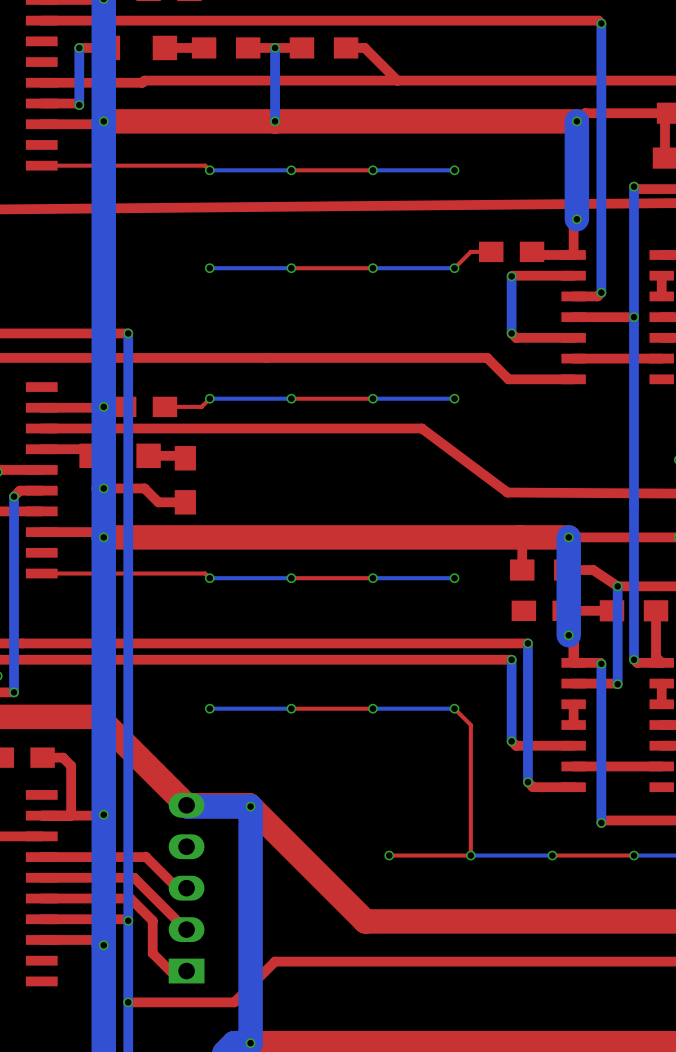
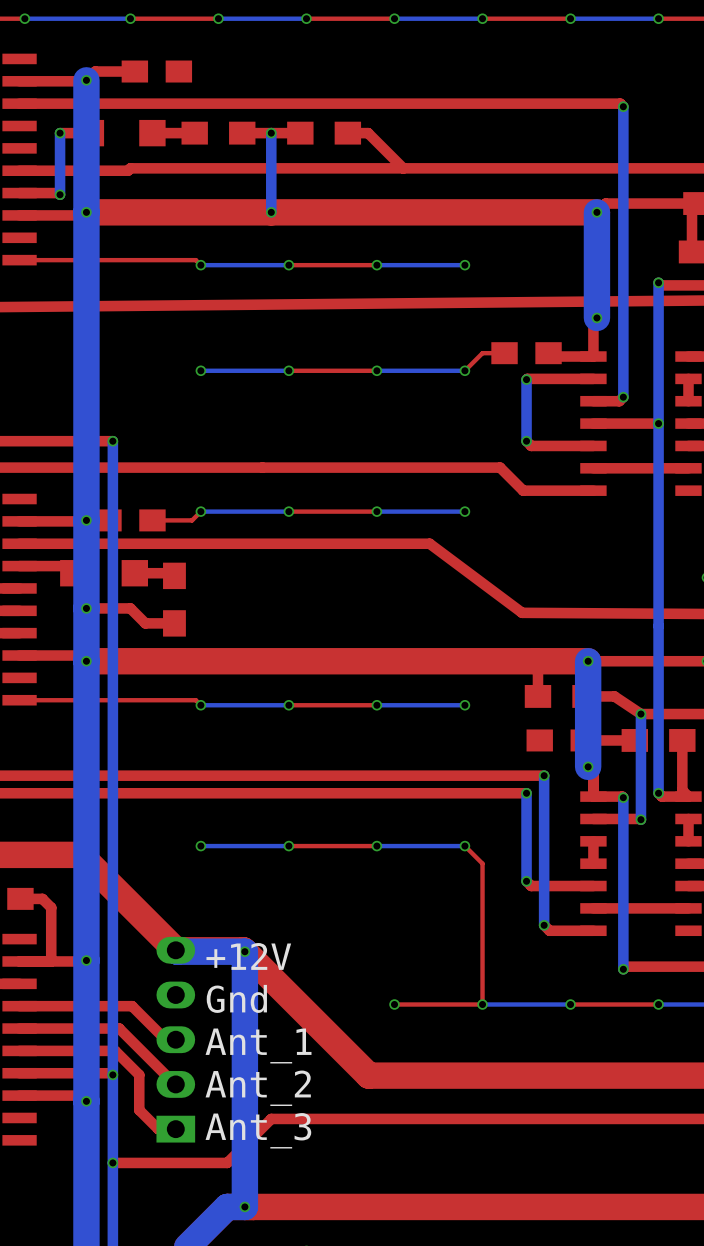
text: none -> +12V (248, 956)
text: none -> Gnd (236, 998)
text: none -> Ant_1 (258, 1045)
text: none -> Ant_2 (258, 1088)
text: none -> Ant_3 (258, 1130)

